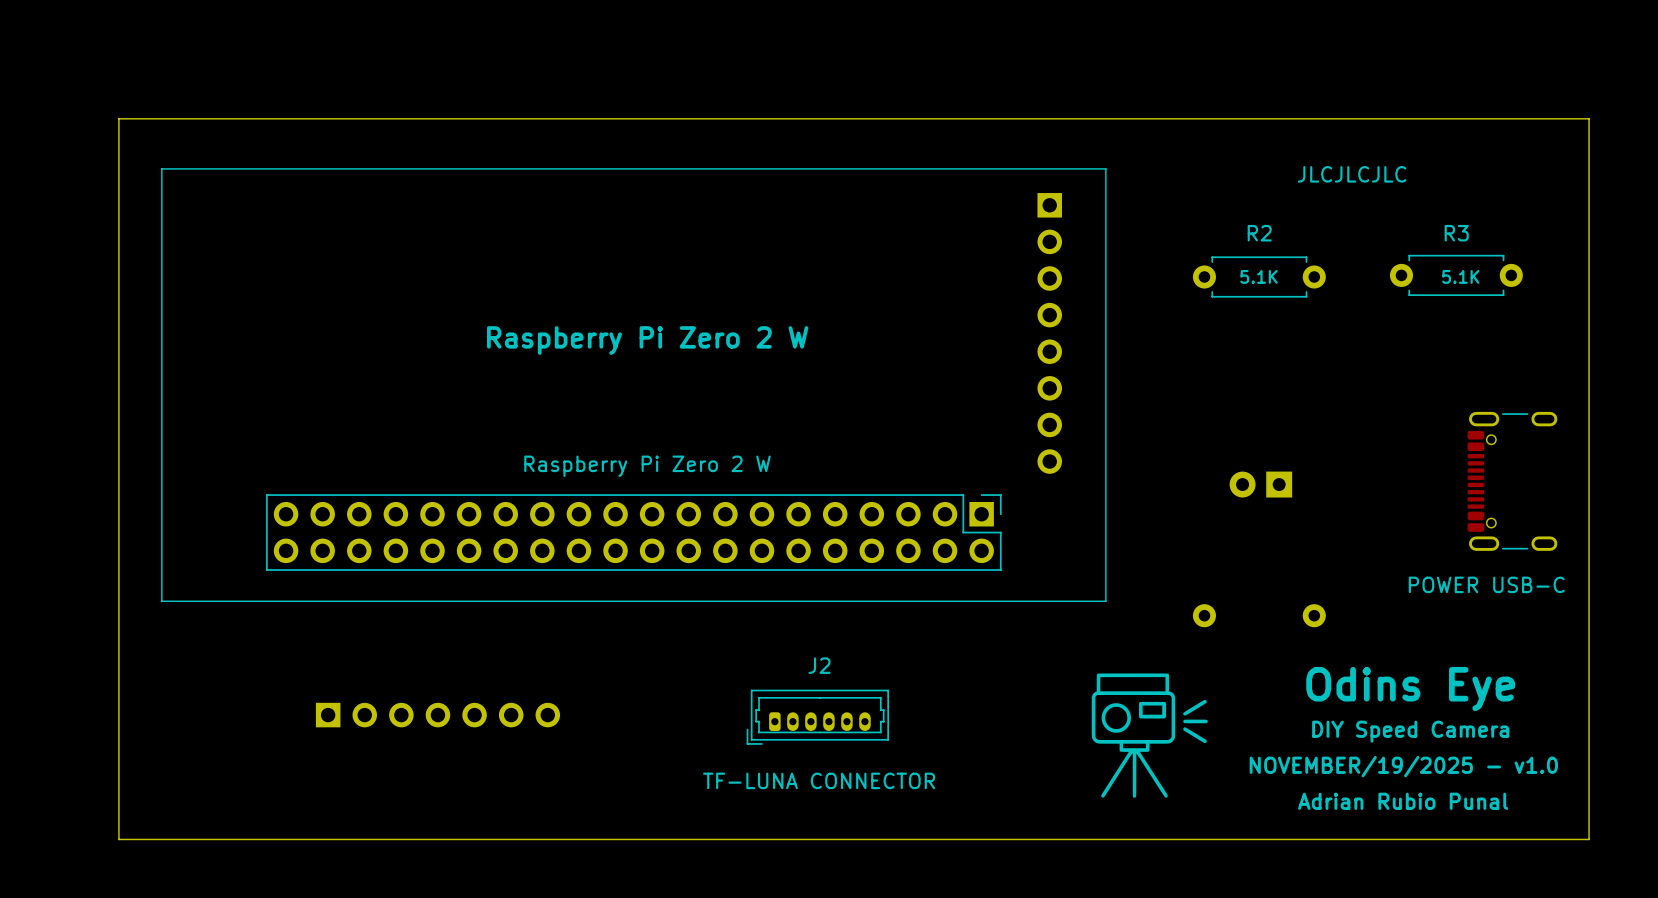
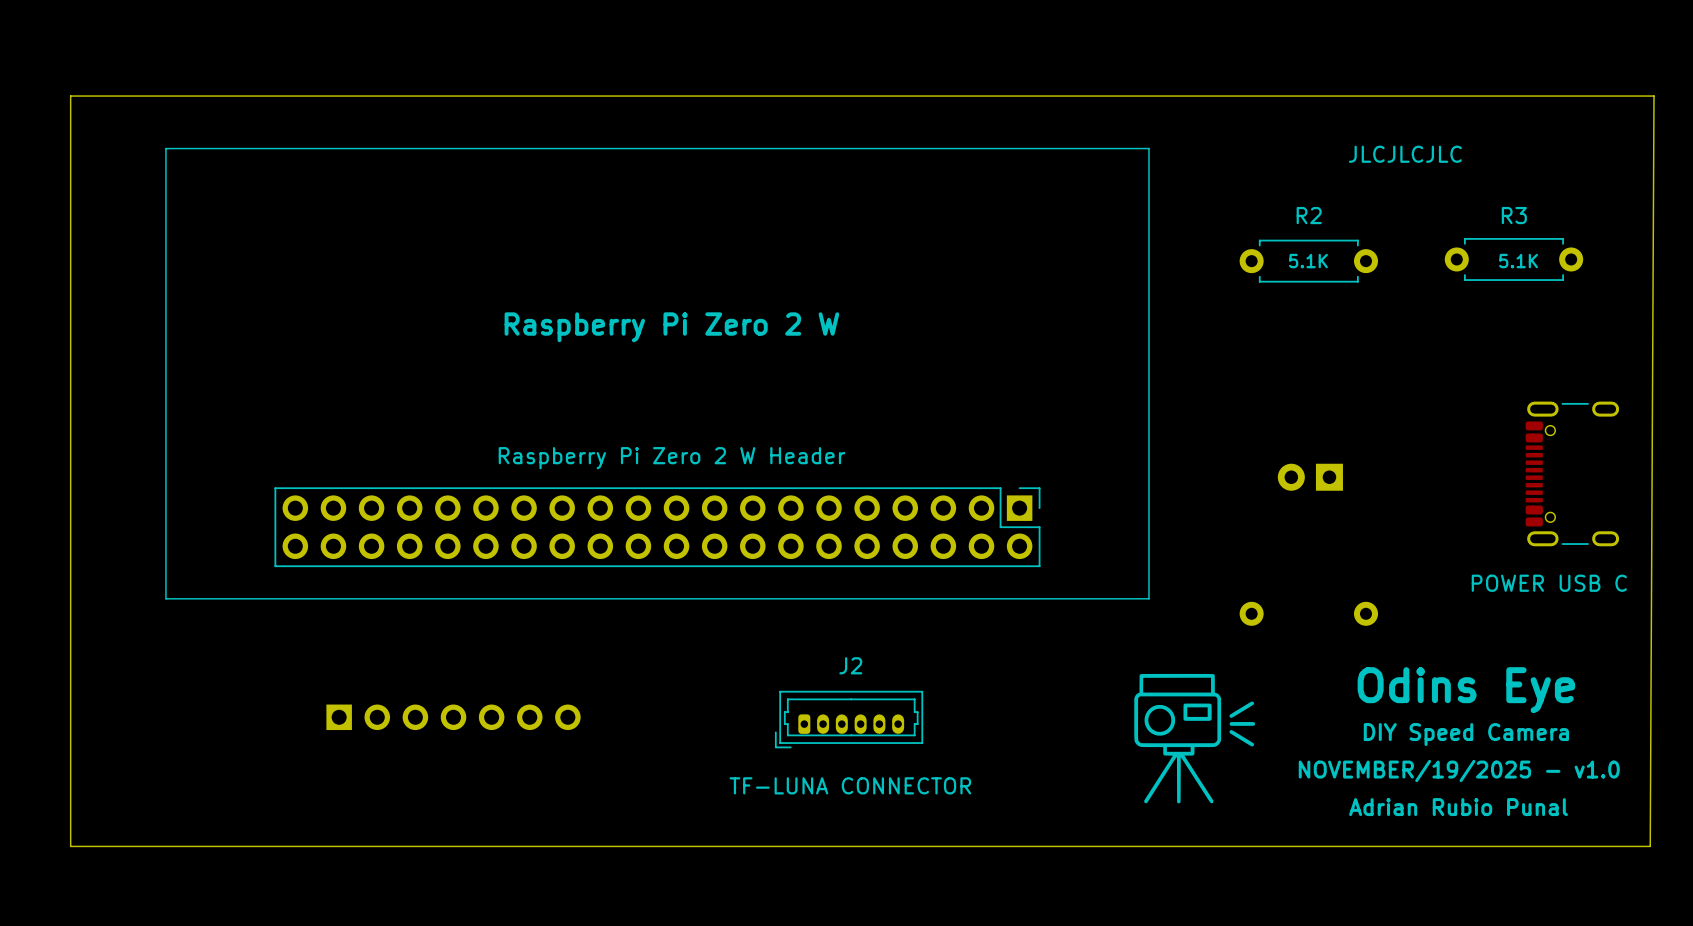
board edge: (118, 118) (1589, 118) (1589, 839) (118, 839) (118, 118) -> (70, 96) (70, 846) (1650, 846) (1654, 96) (70, 96)
part: (1049, 333) -> none
Raspberry Pi Zero 2 W name: Raspberry Pi Zero 2 W (647, 466) -> Raspberry Pi Zero 2 W Header (672, 458)
part value: POWER USB-C (1486, 584) -> POWER USB C (1549, 583)

